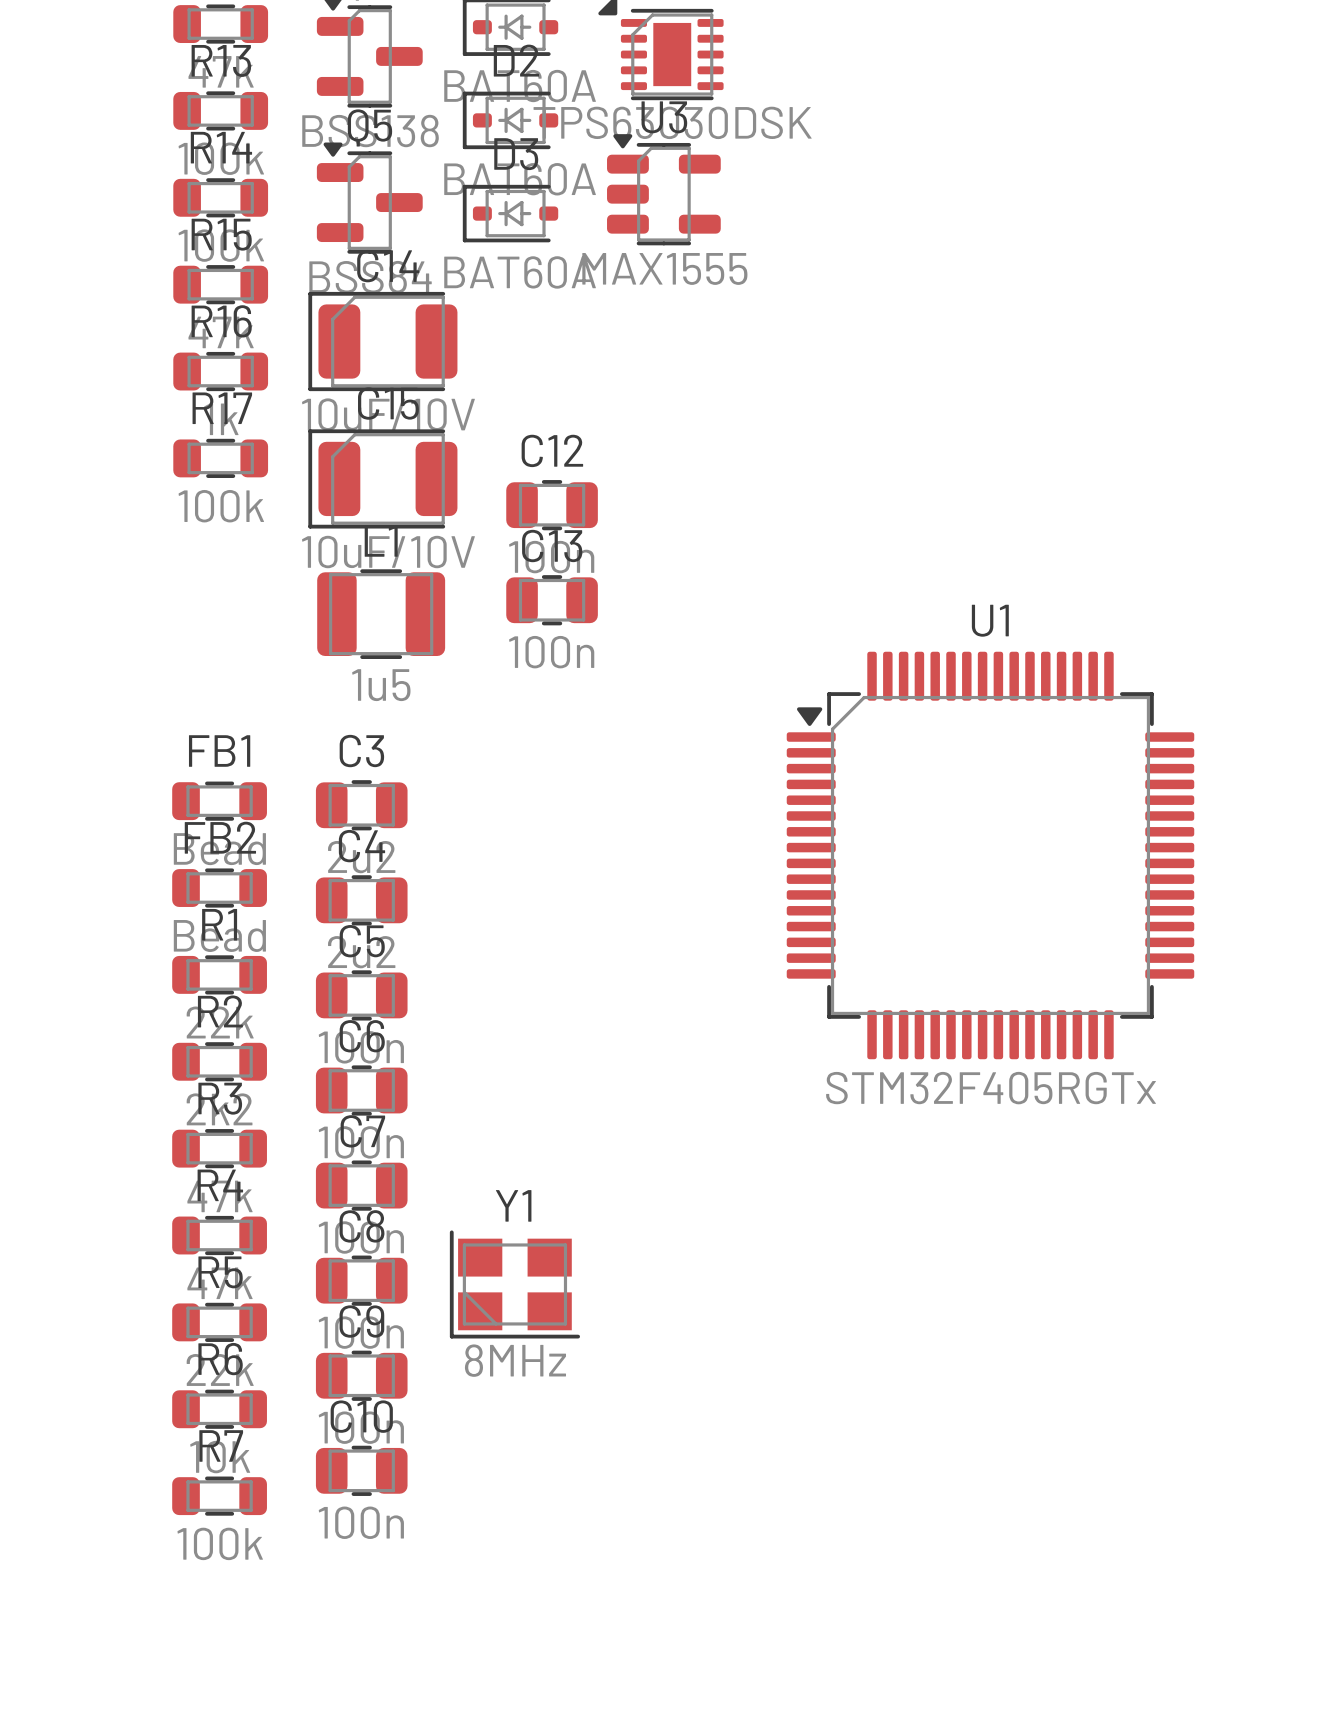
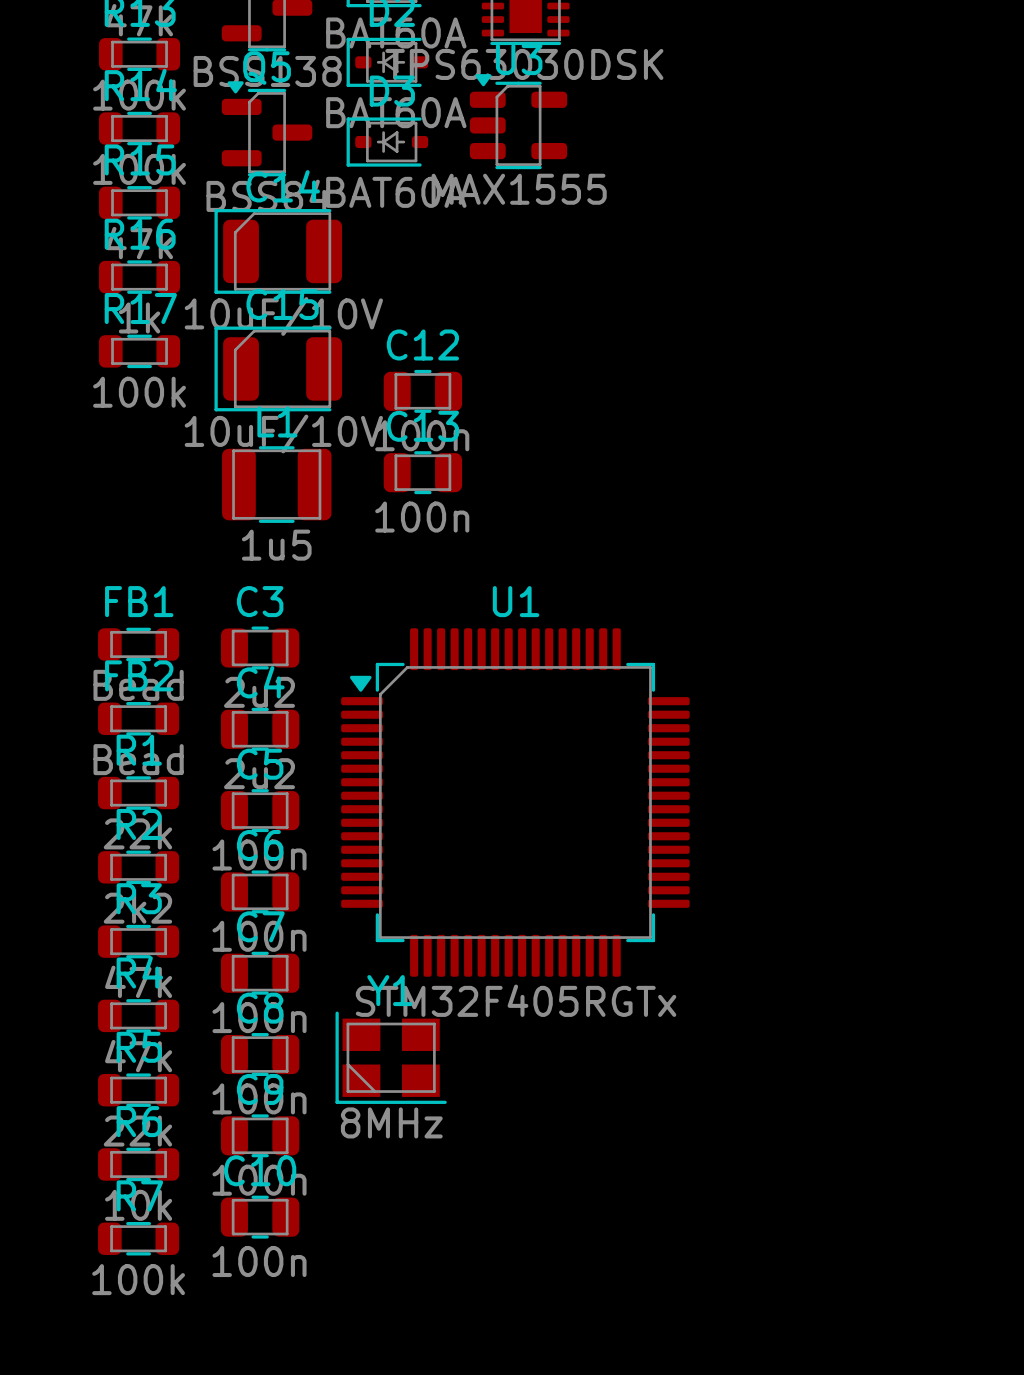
U1 position: (990, 855) -> (515, 802)

